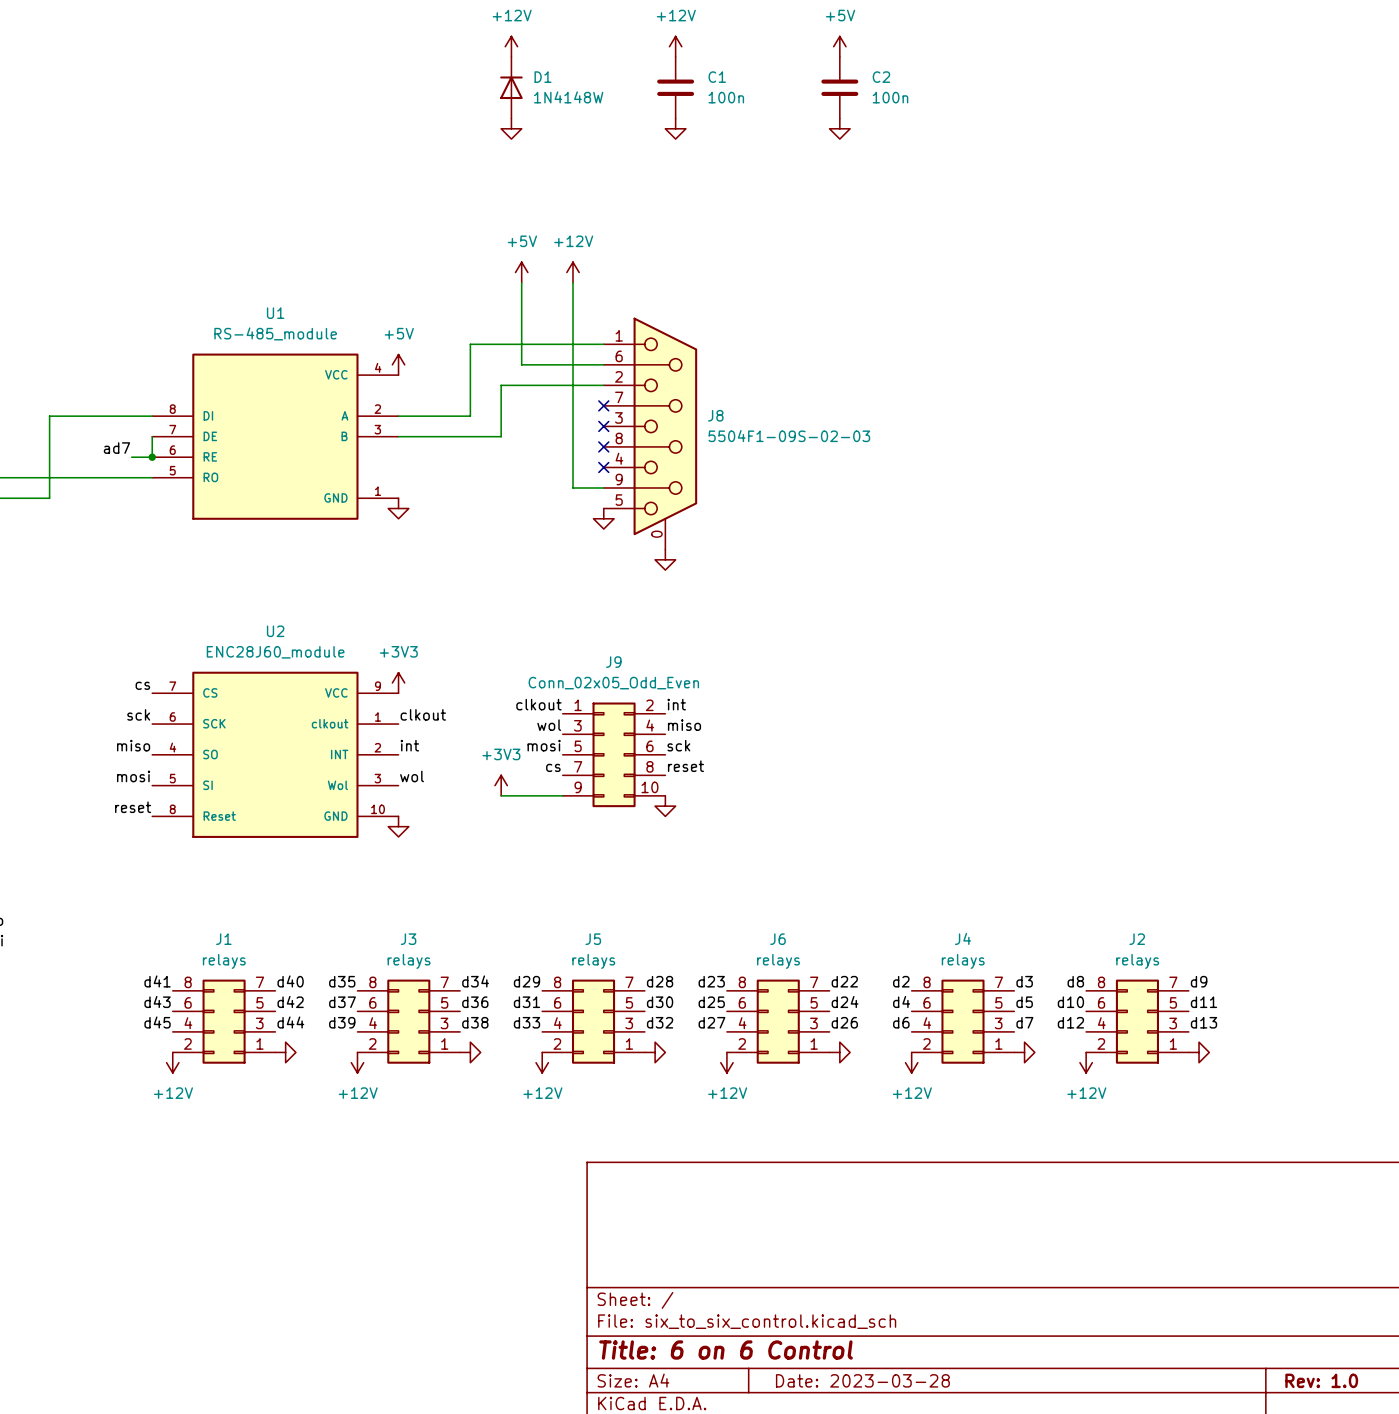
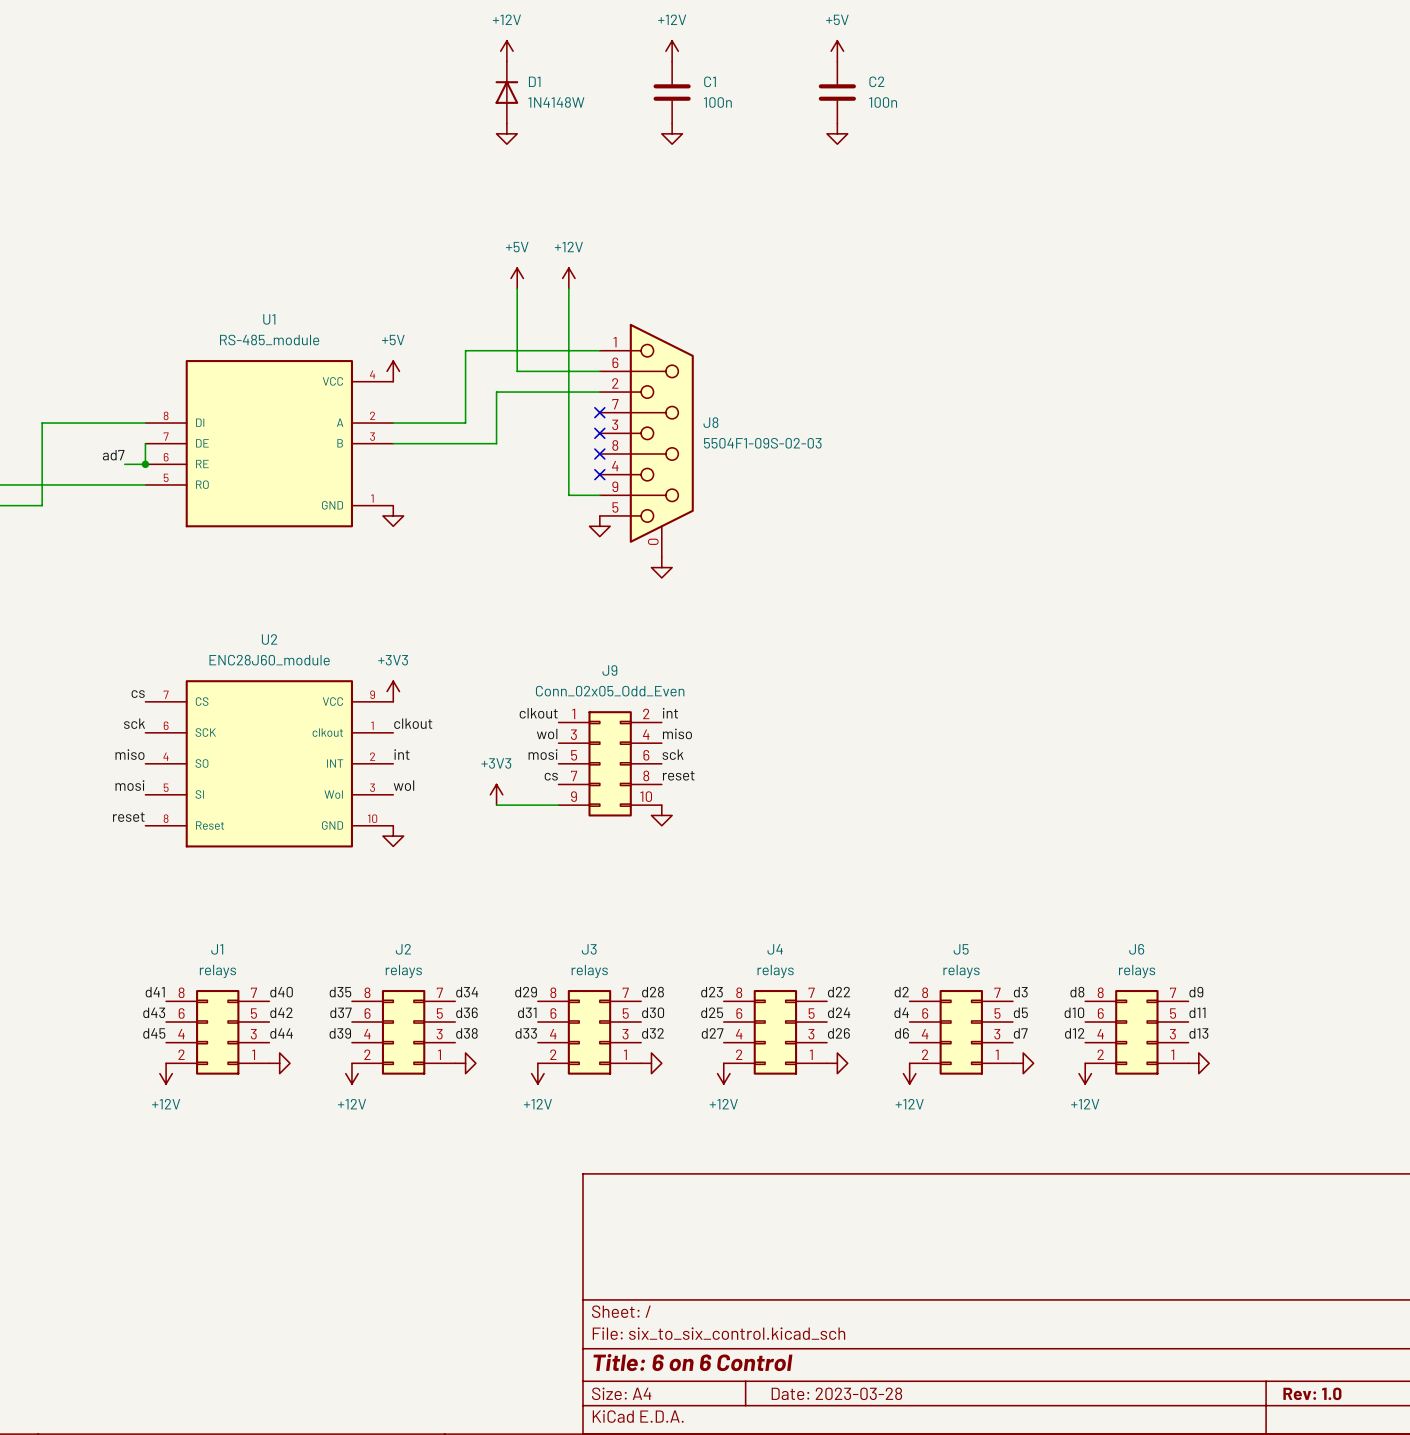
J4 name: J4 (962, 938) -> J5 (961, 949)
J3 name: J3 (408, 939) -> J2 (403, 949)
J5 name: J5 (593, 939) -> J3 (589, 949)
J6 name: J6 (778, 939) -> J4 (775, 949)
J2 name: J2 (1137, 939) -> J6 (1136, 949)

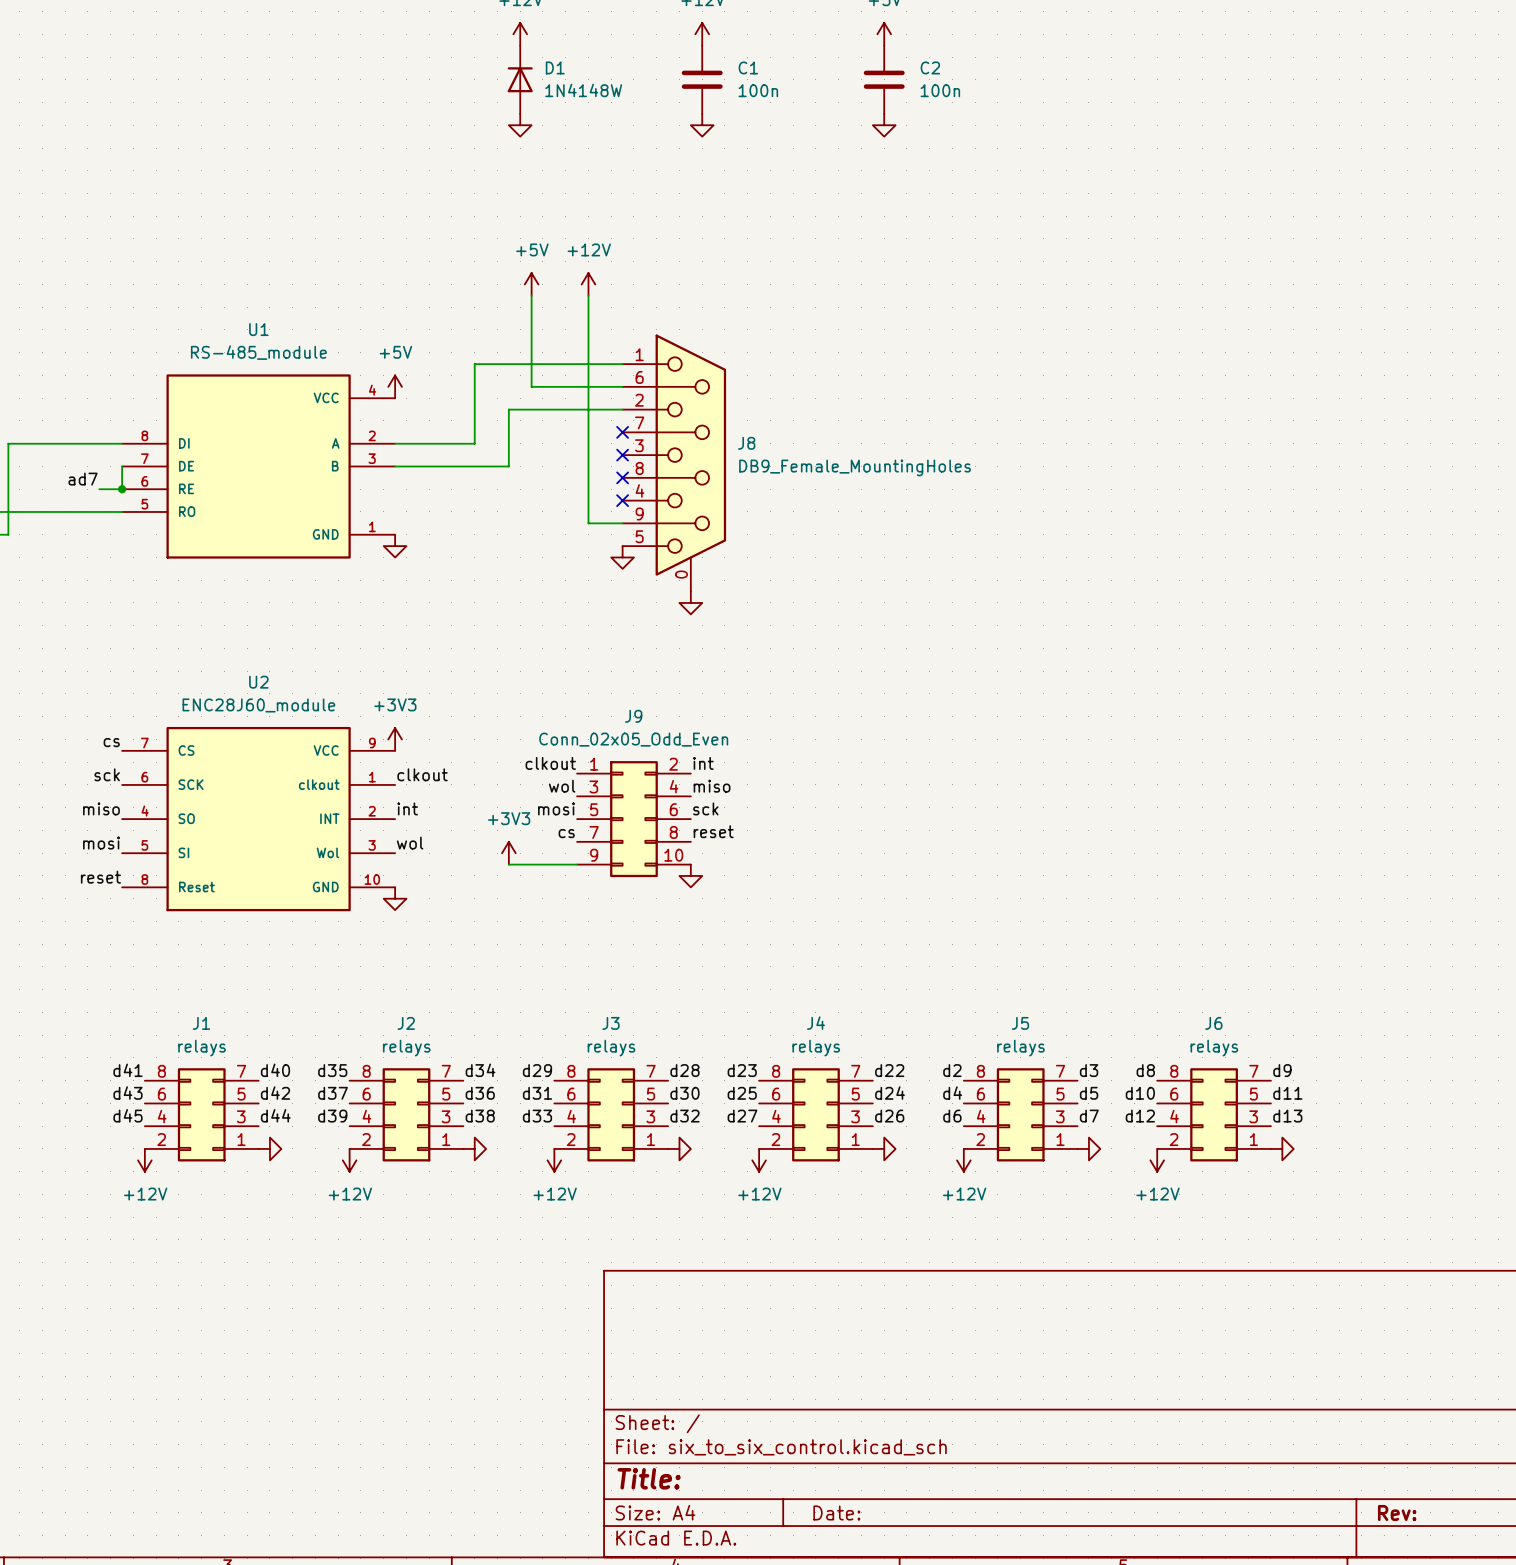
J8 value: 5504F1-09S-02-03 (762, 443) -> DB9_Female_MountingHoles (855, 467)
title block: Title: 6 on 6 Control (692, 1362) -> Title: (649, 1478)
title block: Date: 2023-03-28 (836, 1393) -> Date: (836, 1512)
title block: Rev: 1.0 (1312, 1393) -> Rev: (1397, 1512)

